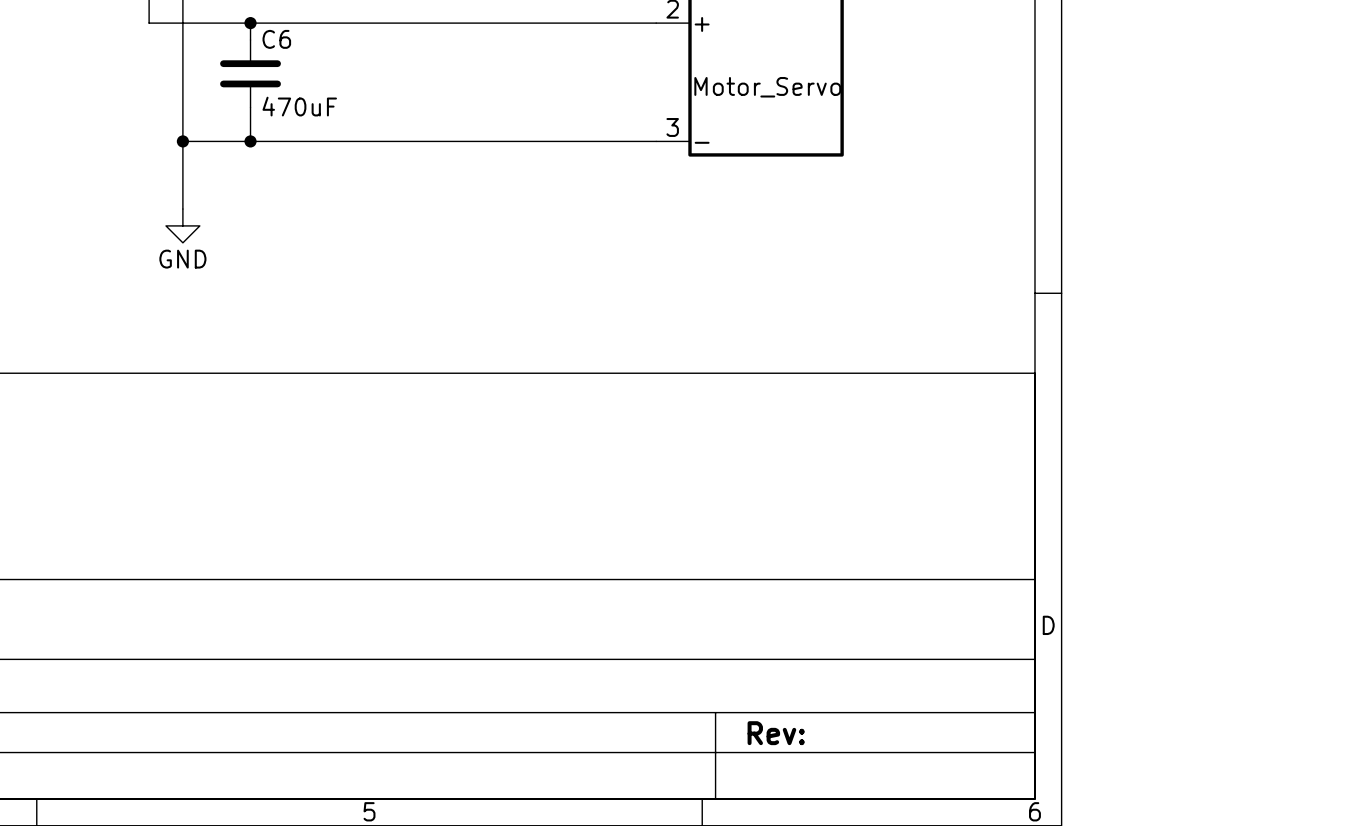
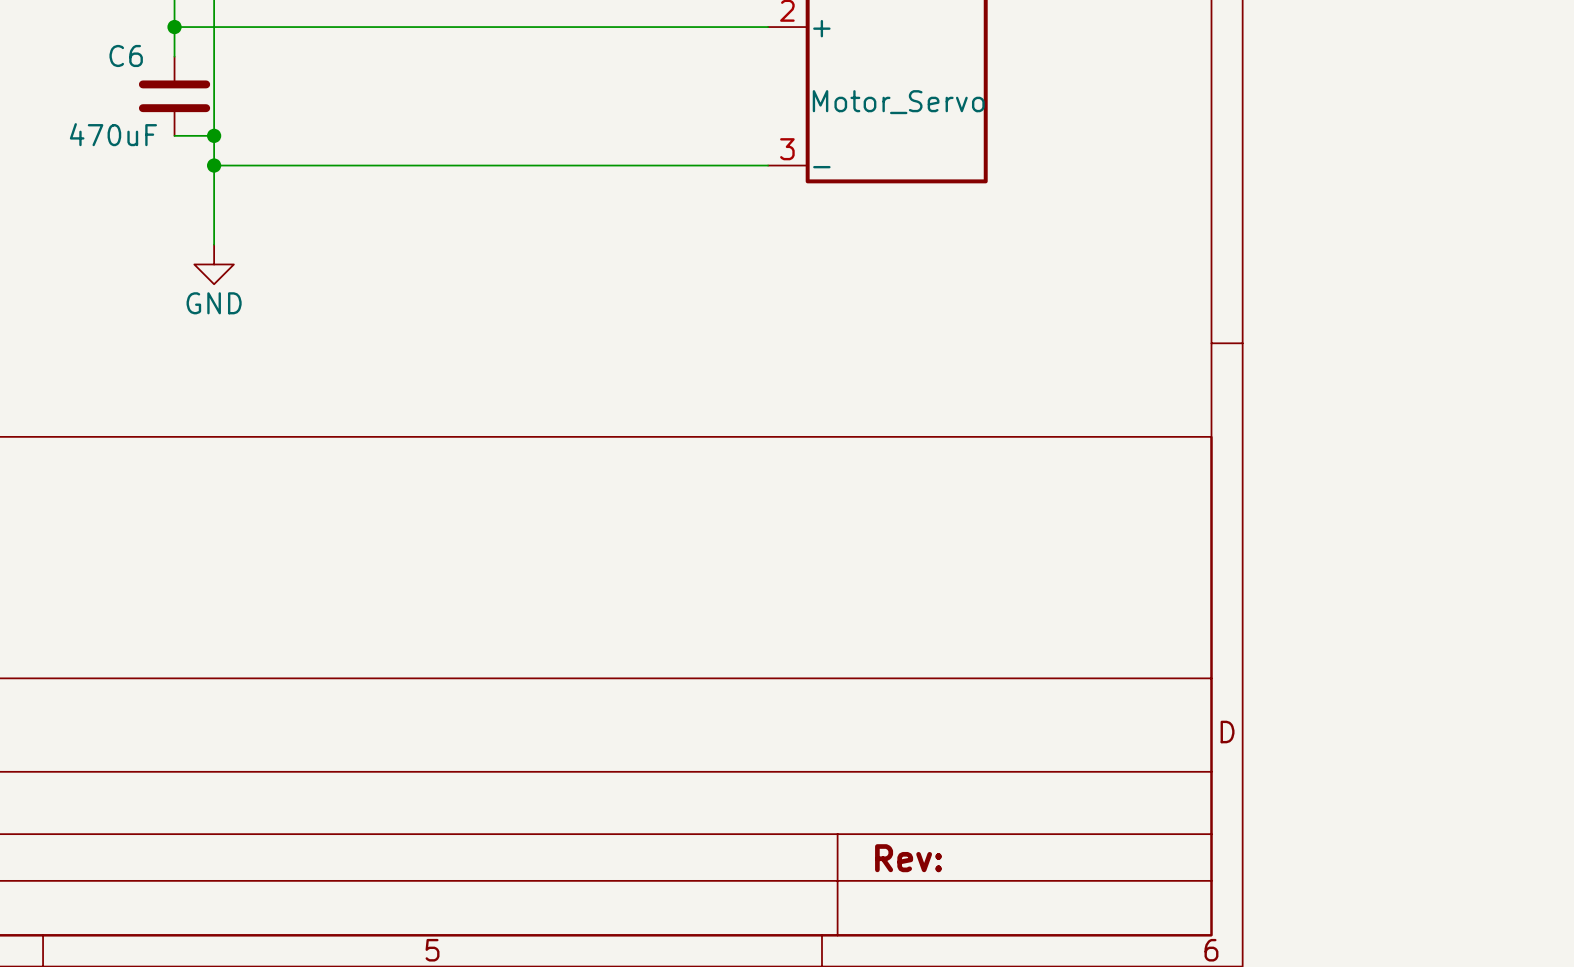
wire: none -> (174, 27) (174, 56)
junction: none -> (174, 27)
wire: (250, 23) (250, 40) -> none
junction: (250, 23) -> none
C6 name position: C6 (276, 39) -> C6 (126, 55)
C6 position: (250, 73) -> (174, 96)
C6 value position: 470uF (299, 106) -> 470uF (113, 134)
wire: (250, 107) (250, 141) -> none
wire: none -> (174, 135) (214, 135)
junction: none -> (214, 135)
junction: (250, 141) -> none

